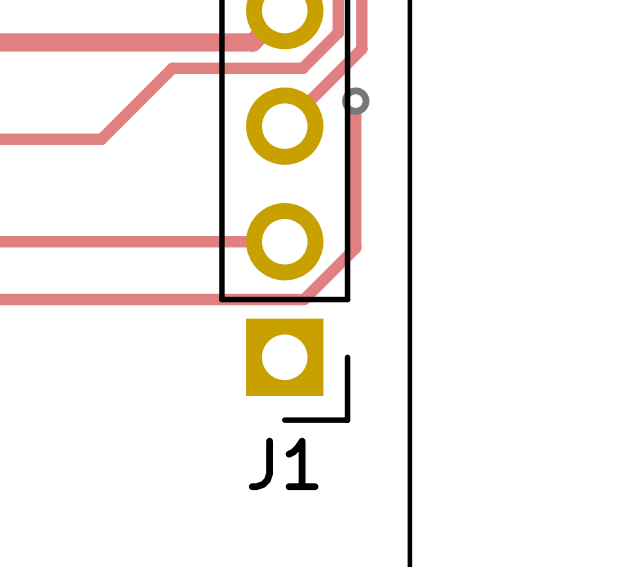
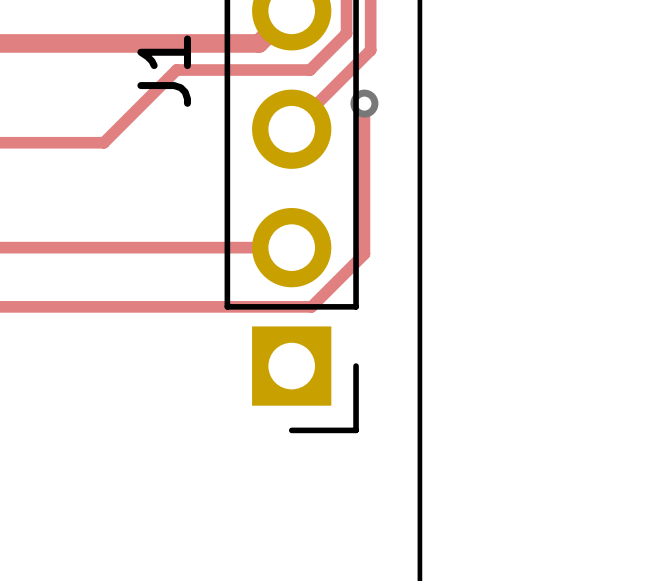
J1 name rotation: 0° (283, 463) -> 90° counterclockwise (164, 71)
J1 name position: J1 (283, 463) -> J1 (164, 71)

